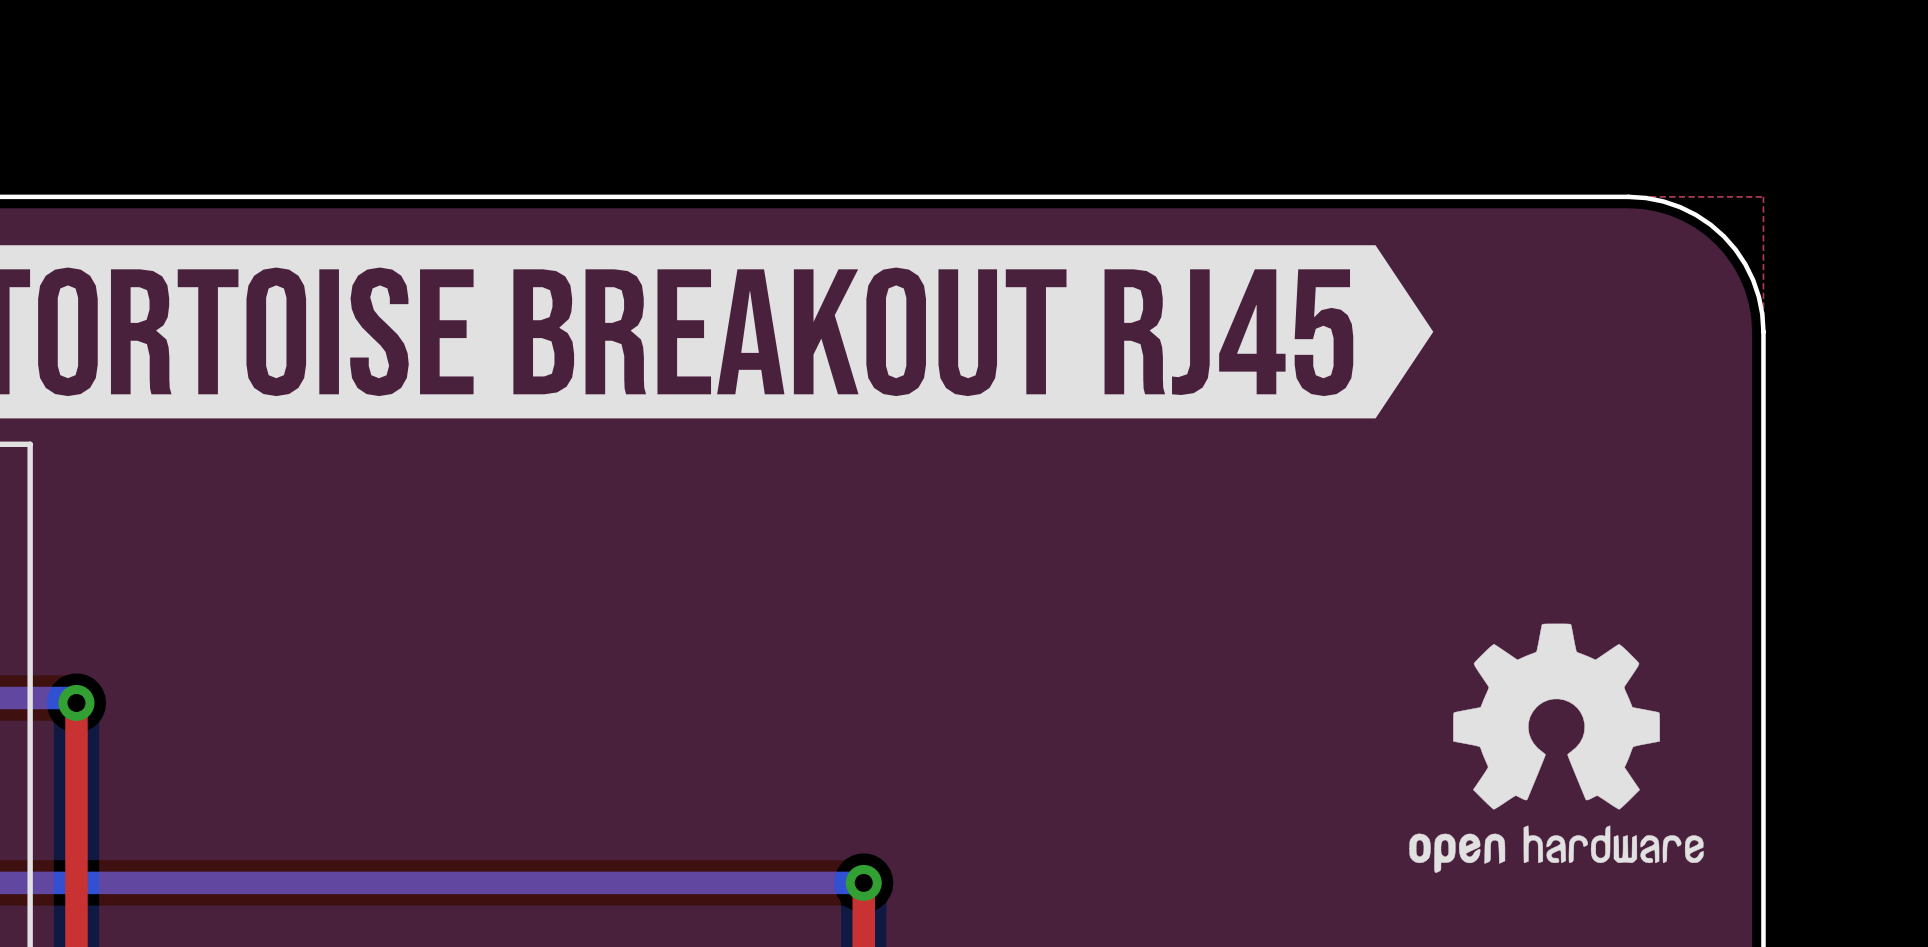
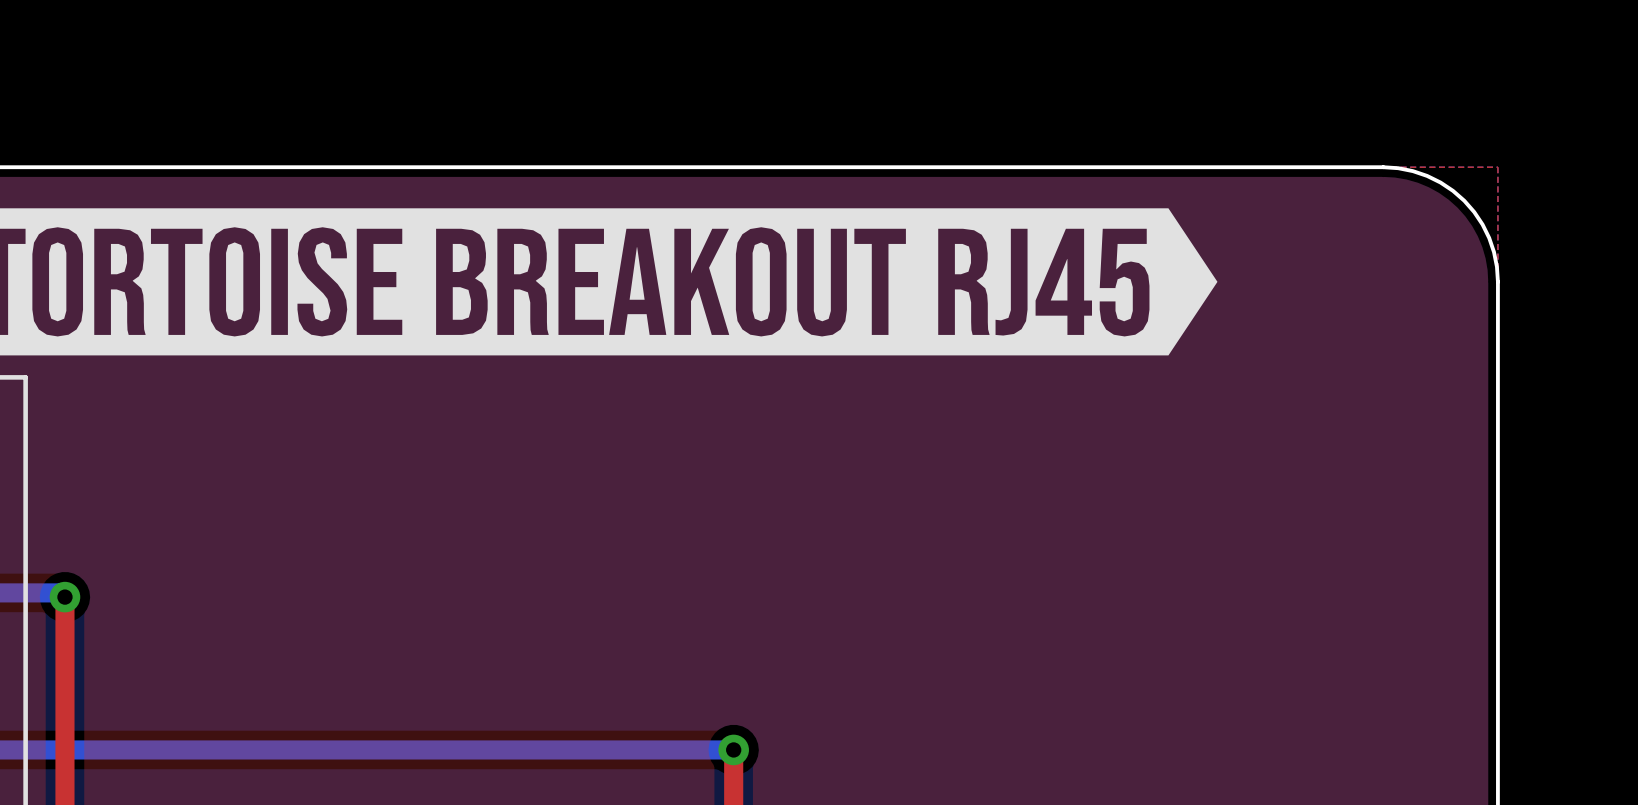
drawing: [1409, 623, 1704, 873] -> none

